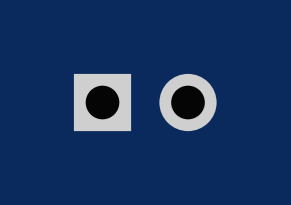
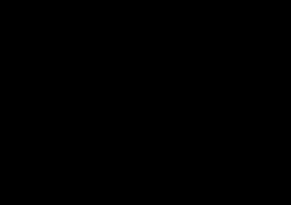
part: (145, 102) -> none

